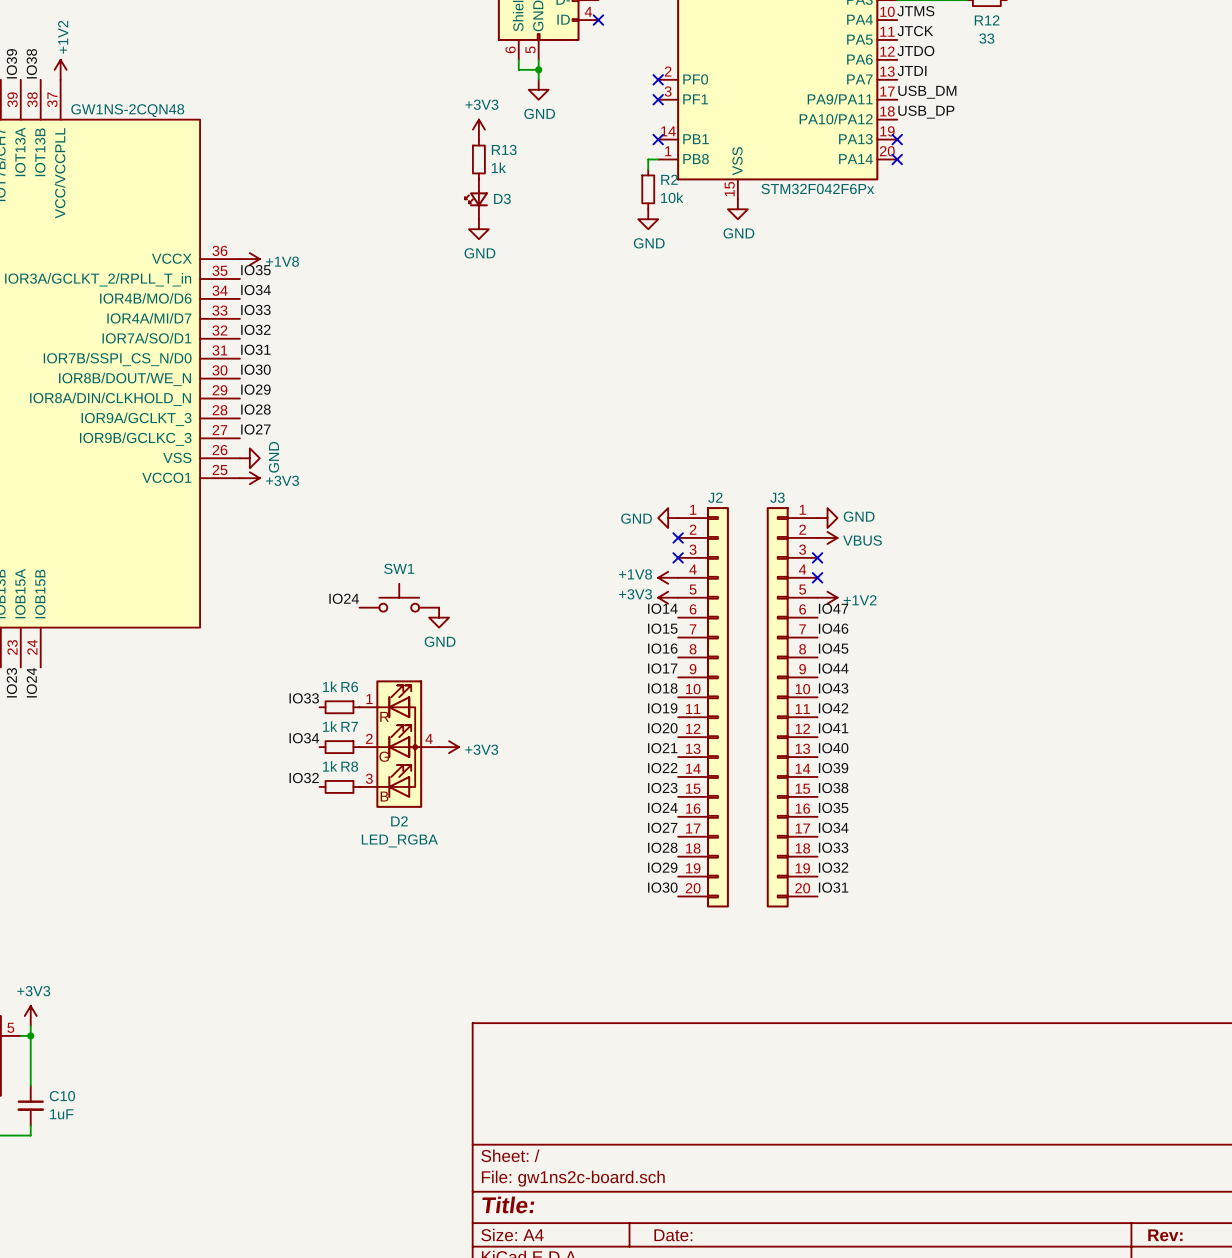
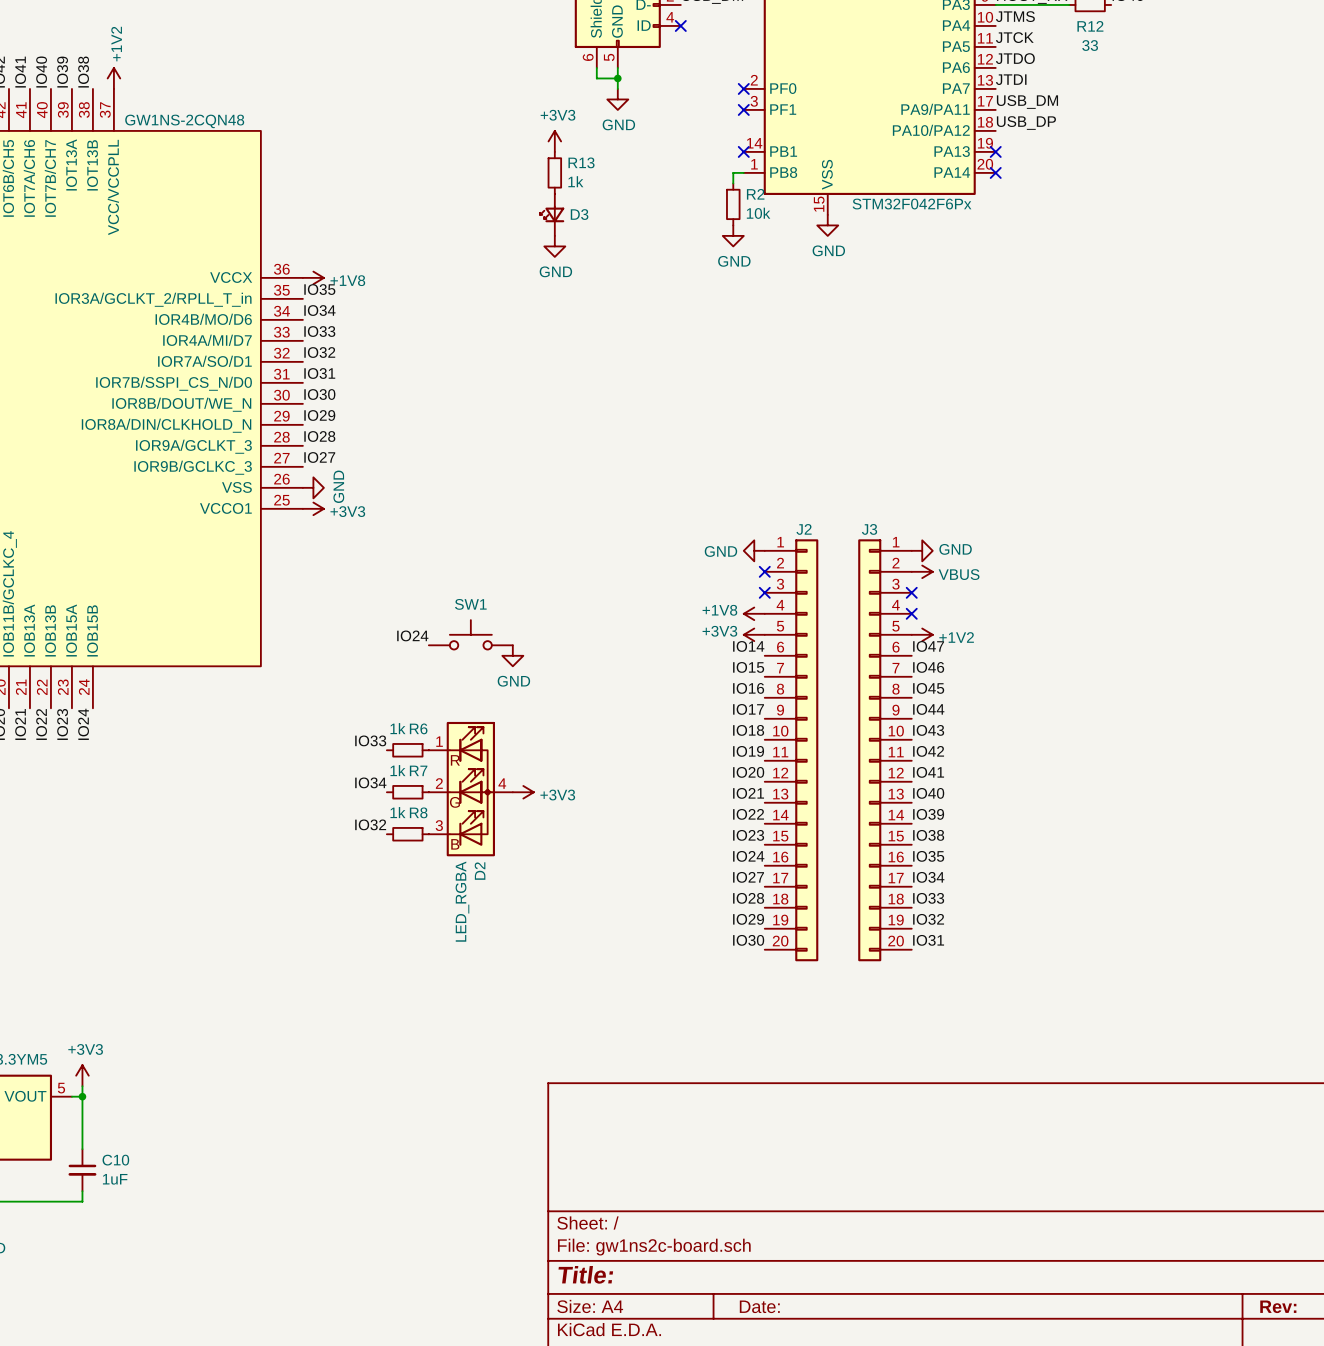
D2 name rotation: 0° (399, 821) -> 90° counterclockwise (480, 871)
D2 value rotation: 0° (399, 840) -> 90° counterclockwise (462, 901)

